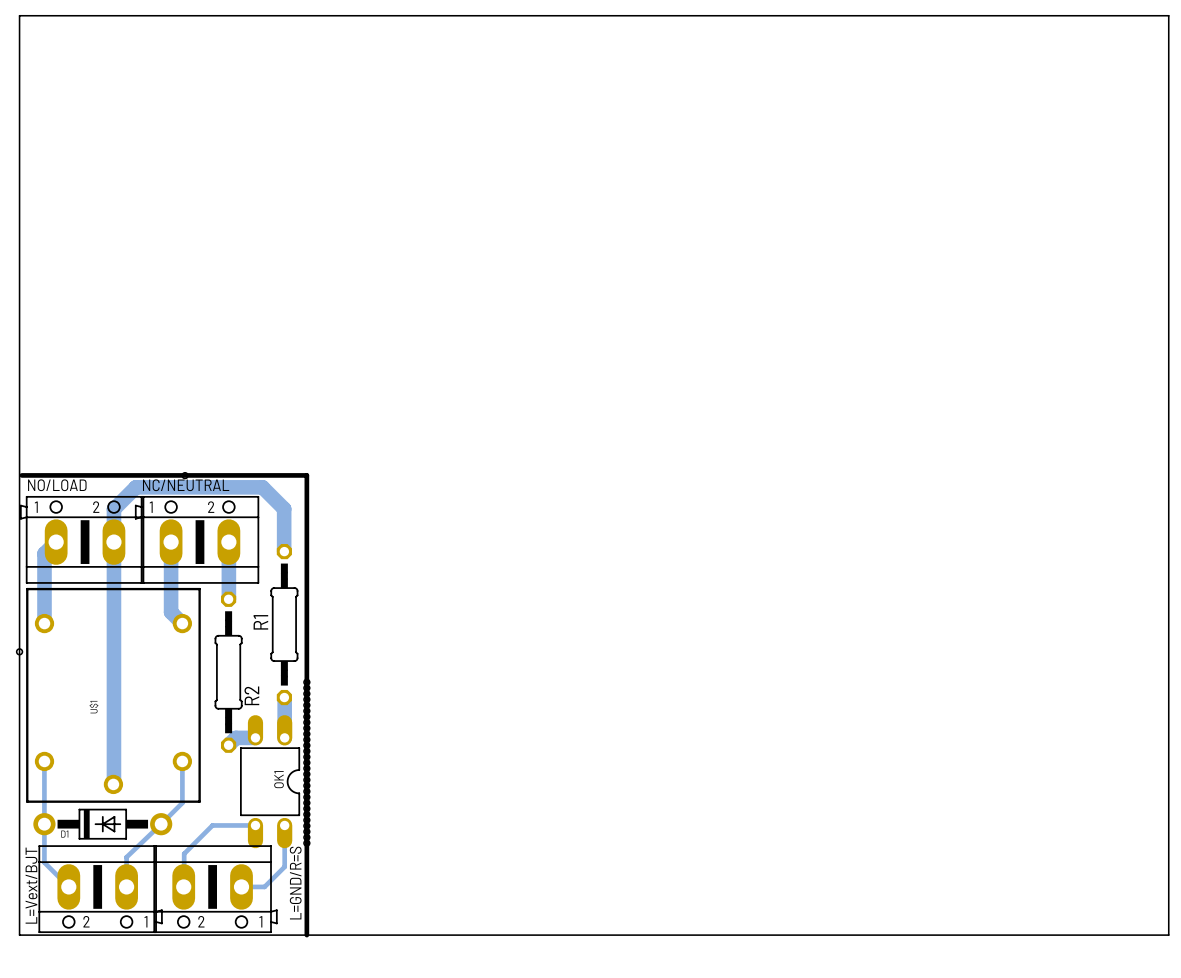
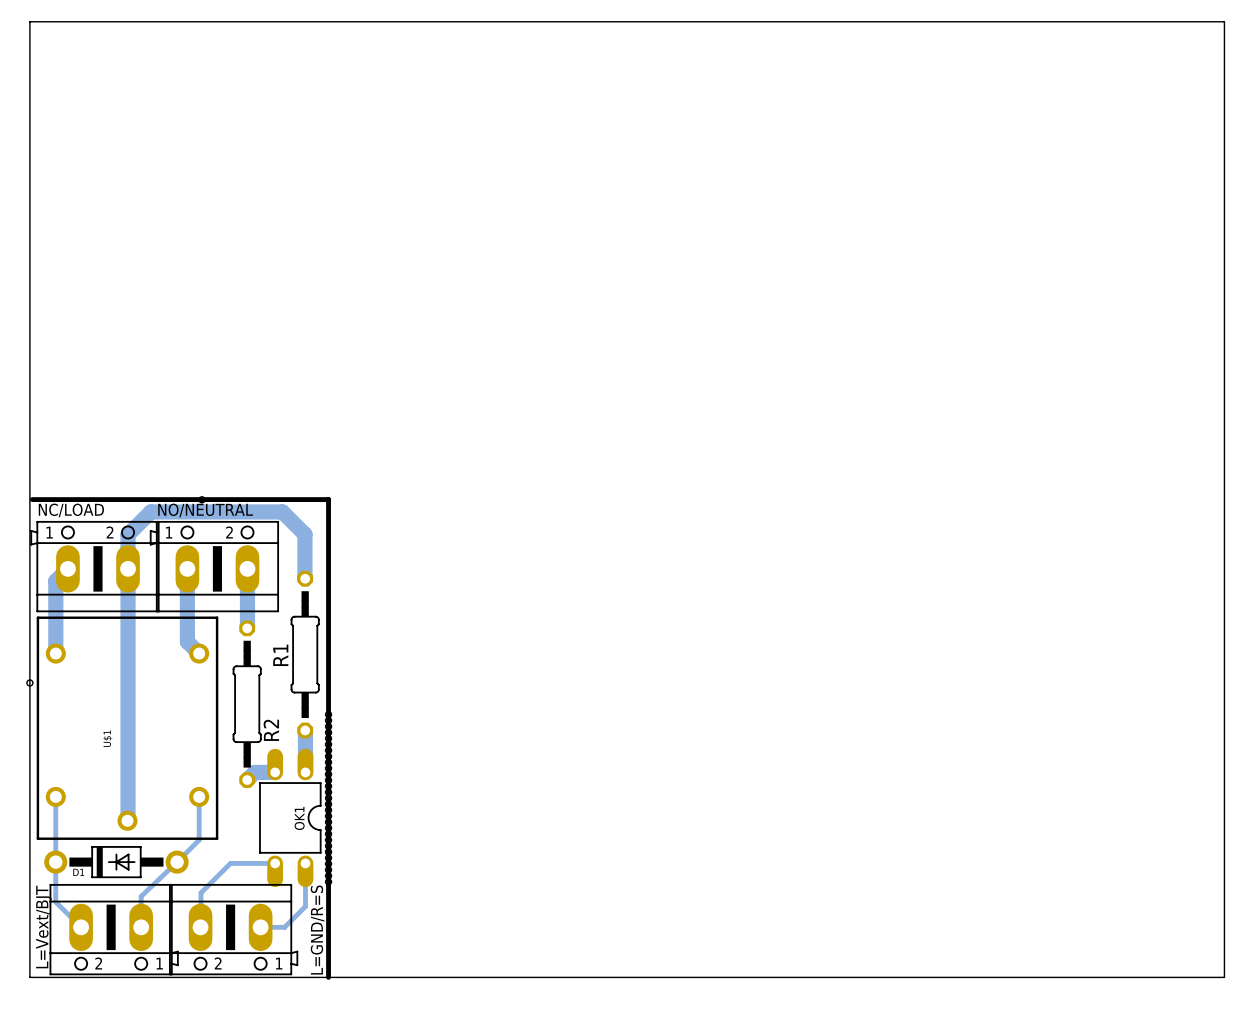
NO/LOAD name: NO/LOAD (57, 485) -> NC/LOAD (71, 510)
NC/NEUTRAL name: NC/NEUTRAL (186, 485) -> NO/NEUTRAL (205, 510)

